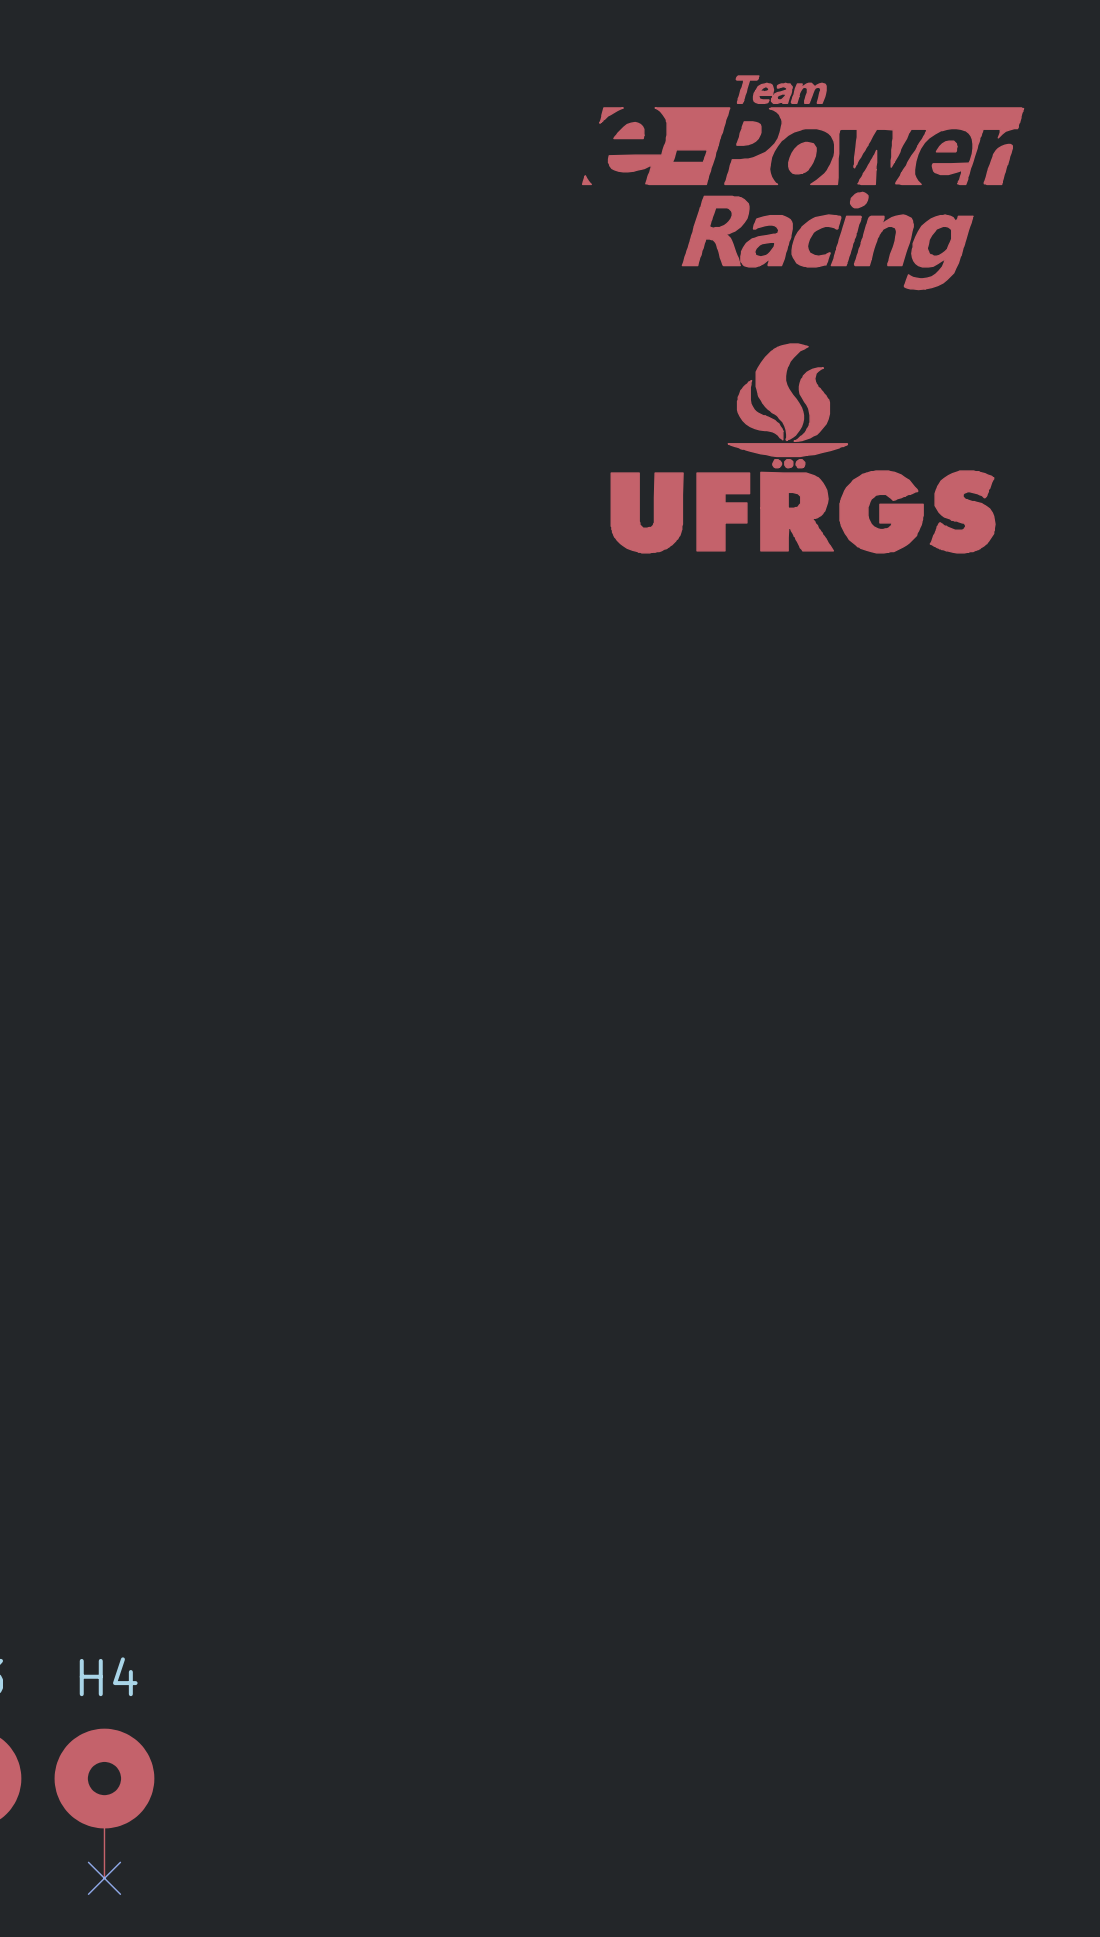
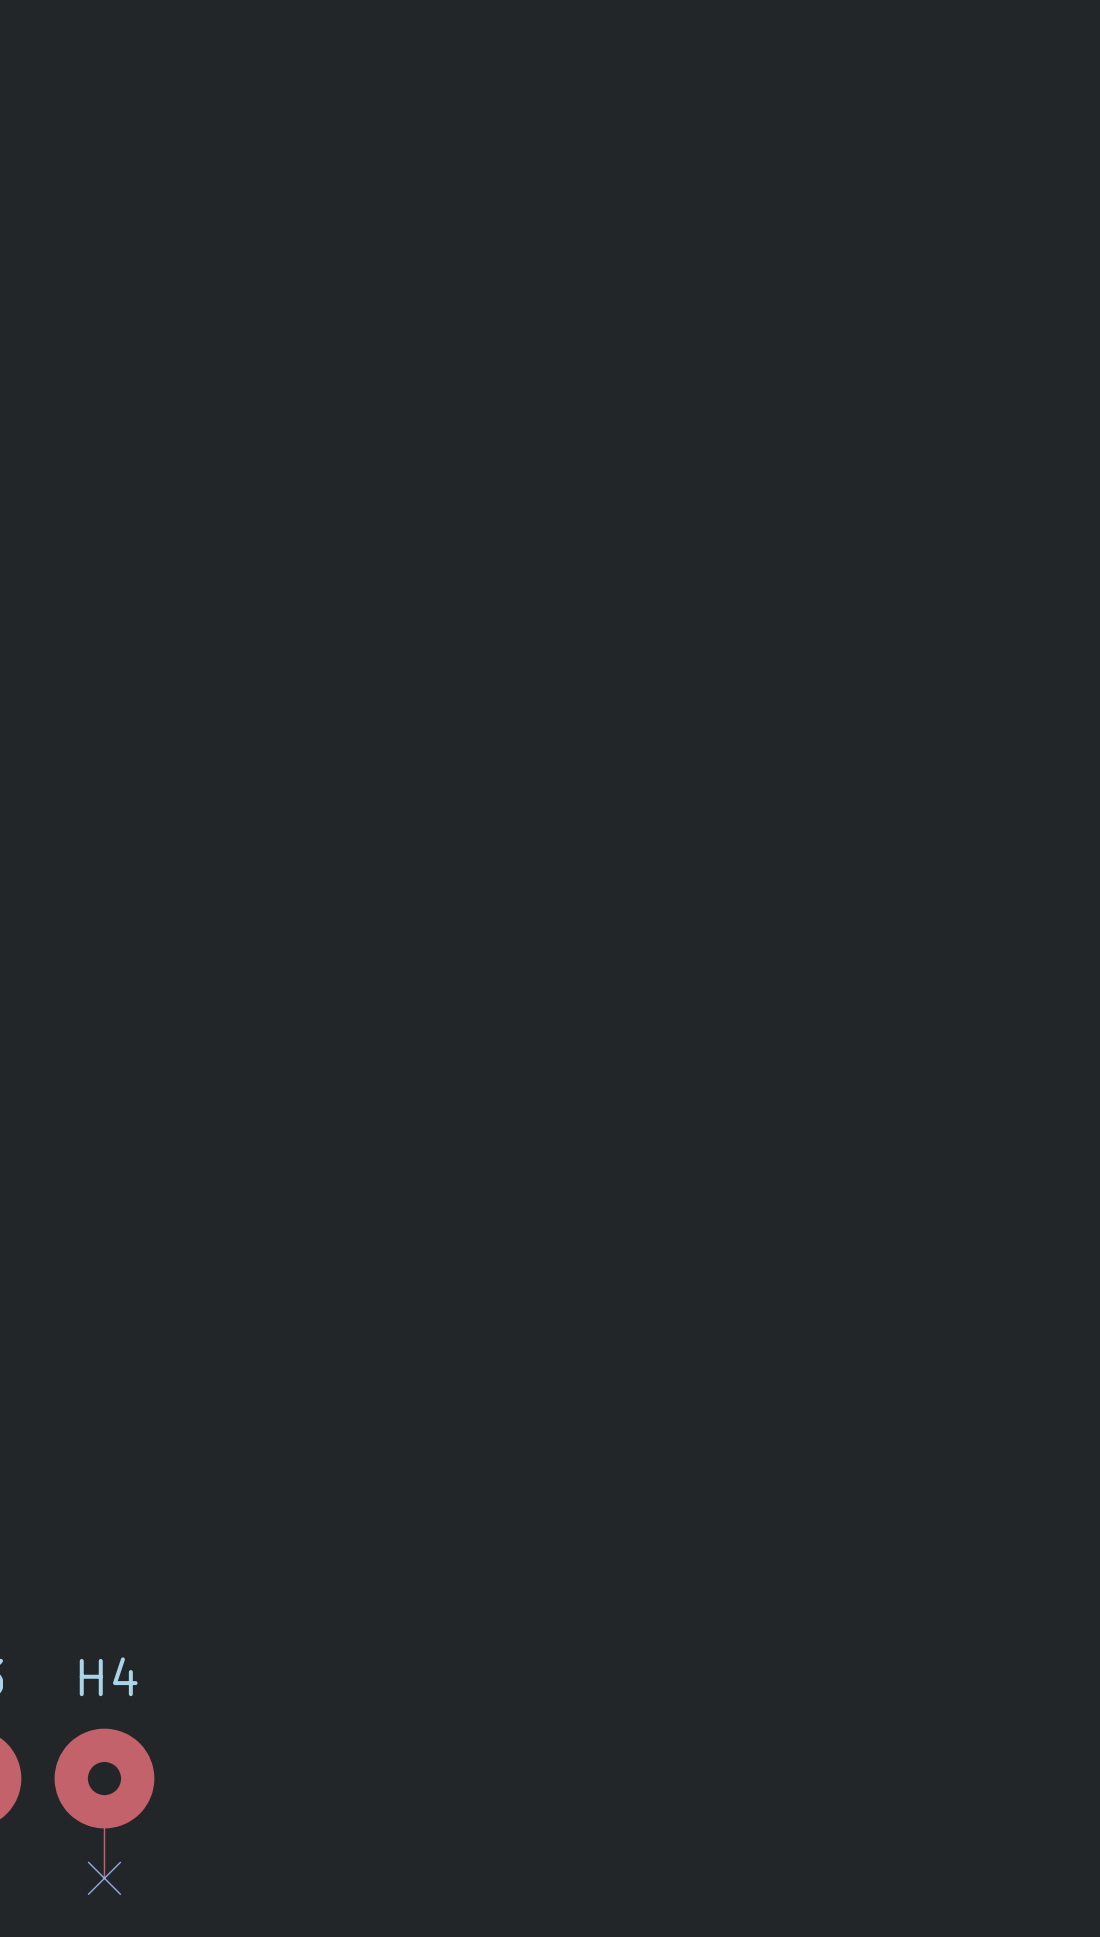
part: (803, 182) -> none
part: (803, 448) -> none

